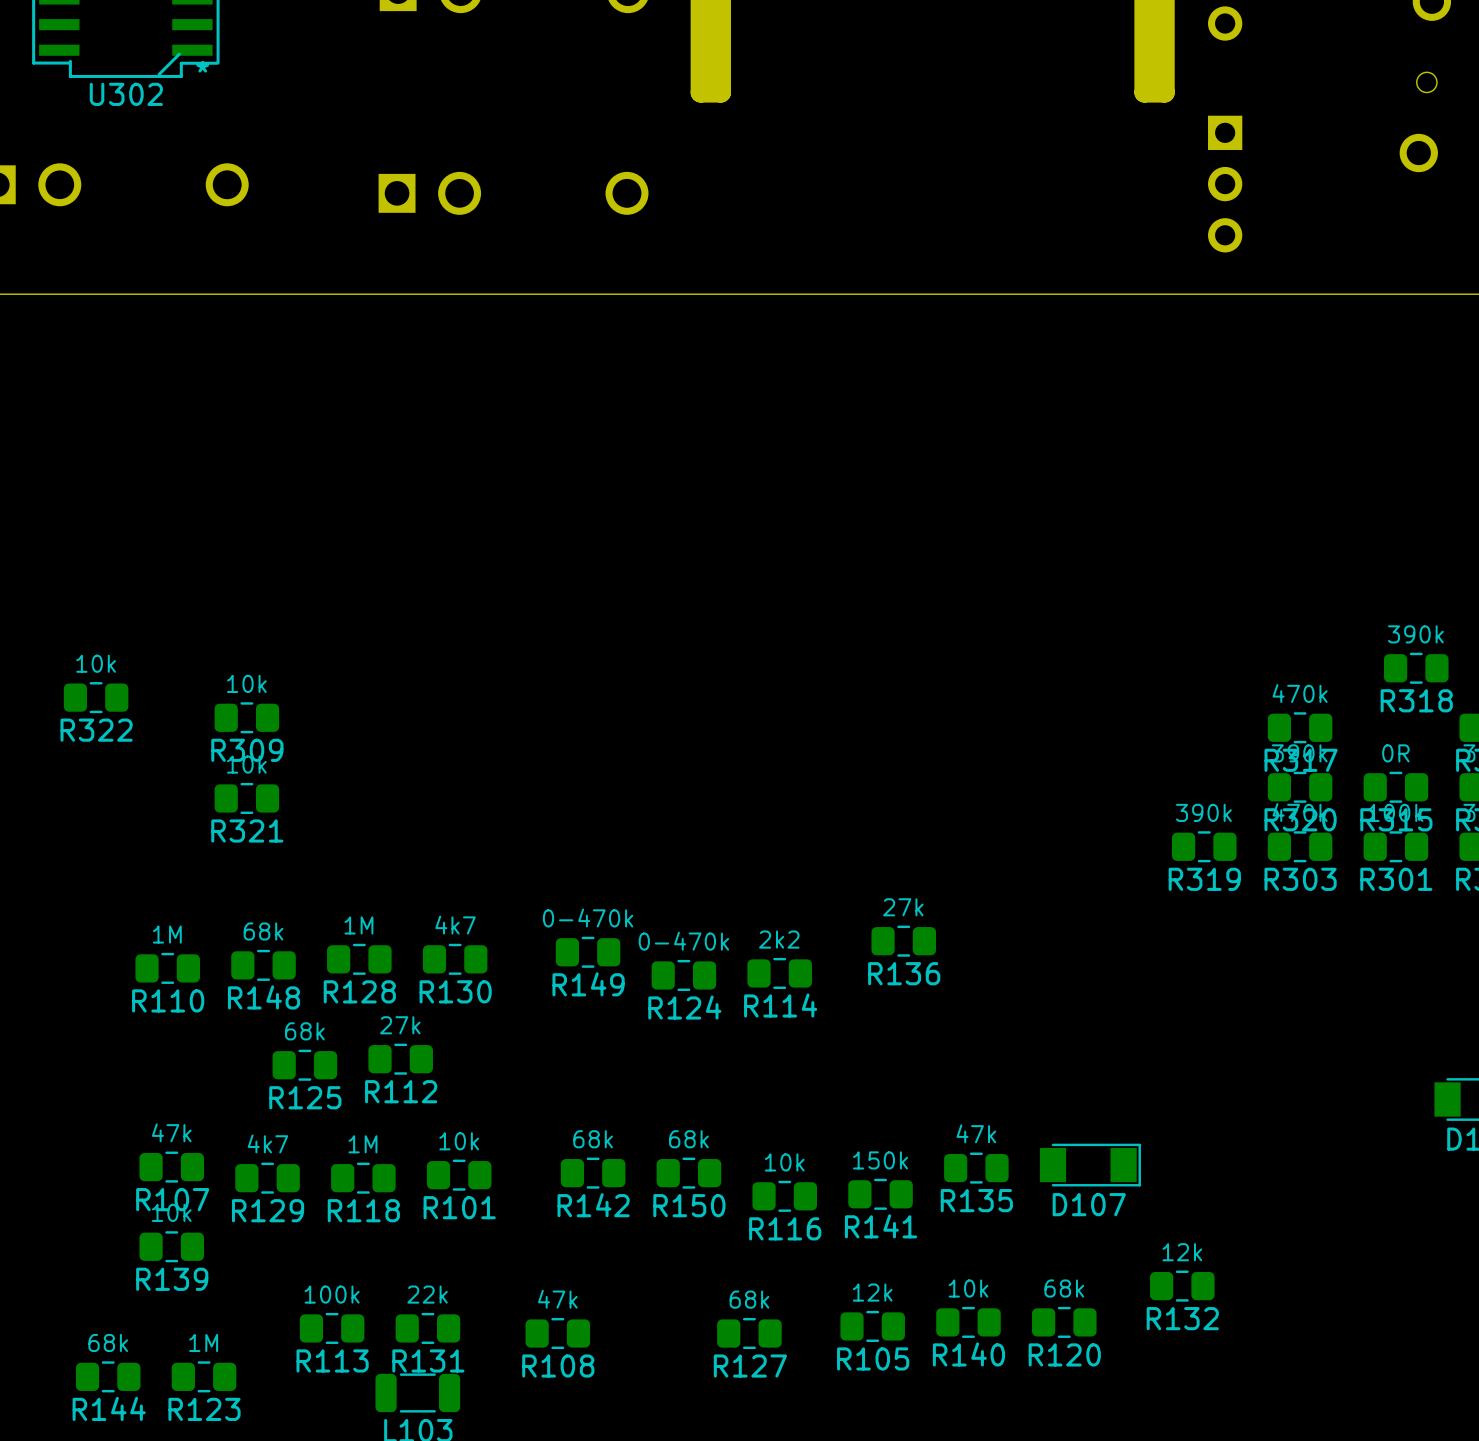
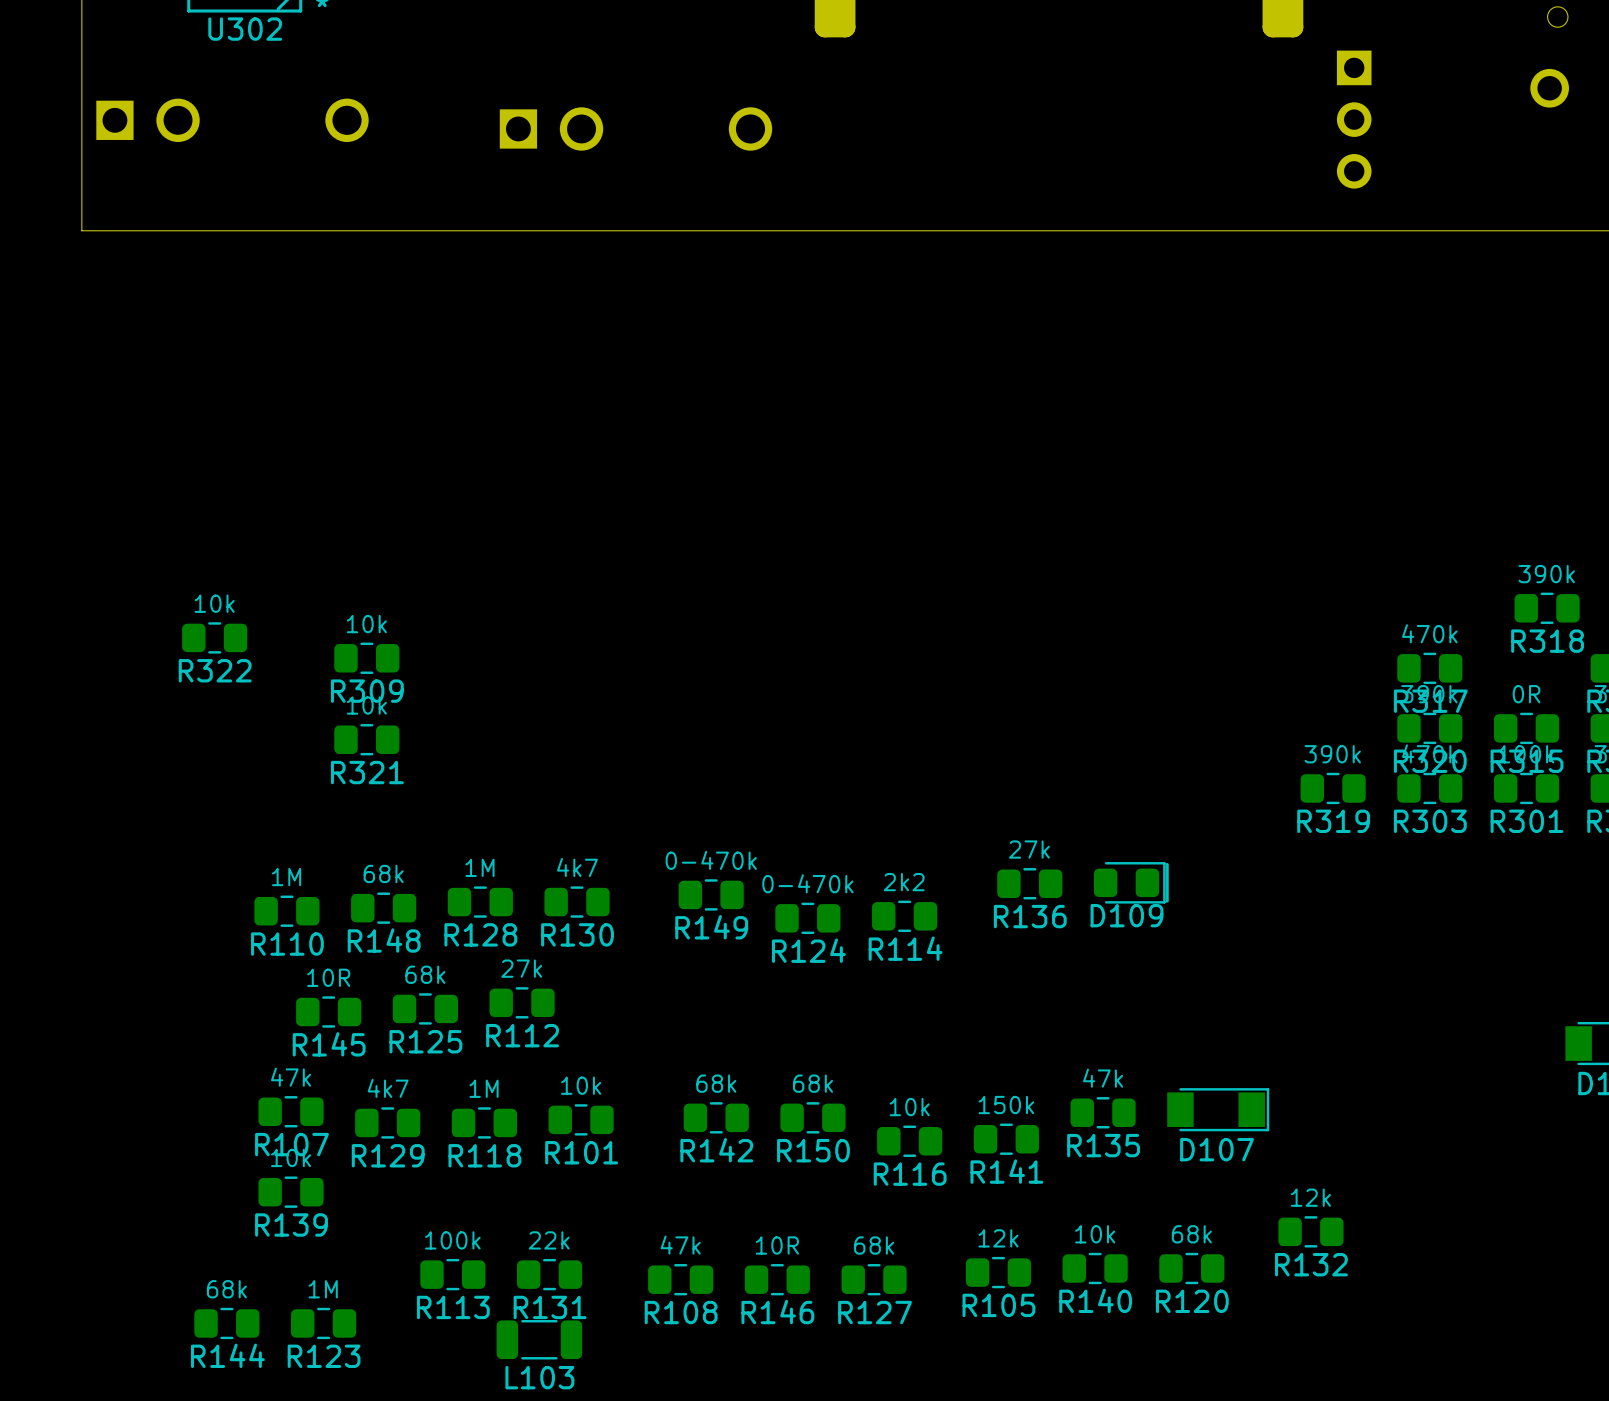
D109: none -> (1131, 882)
R145: none -> 10R (328, 1011)
R146: none -> 10R (777, 1279)

